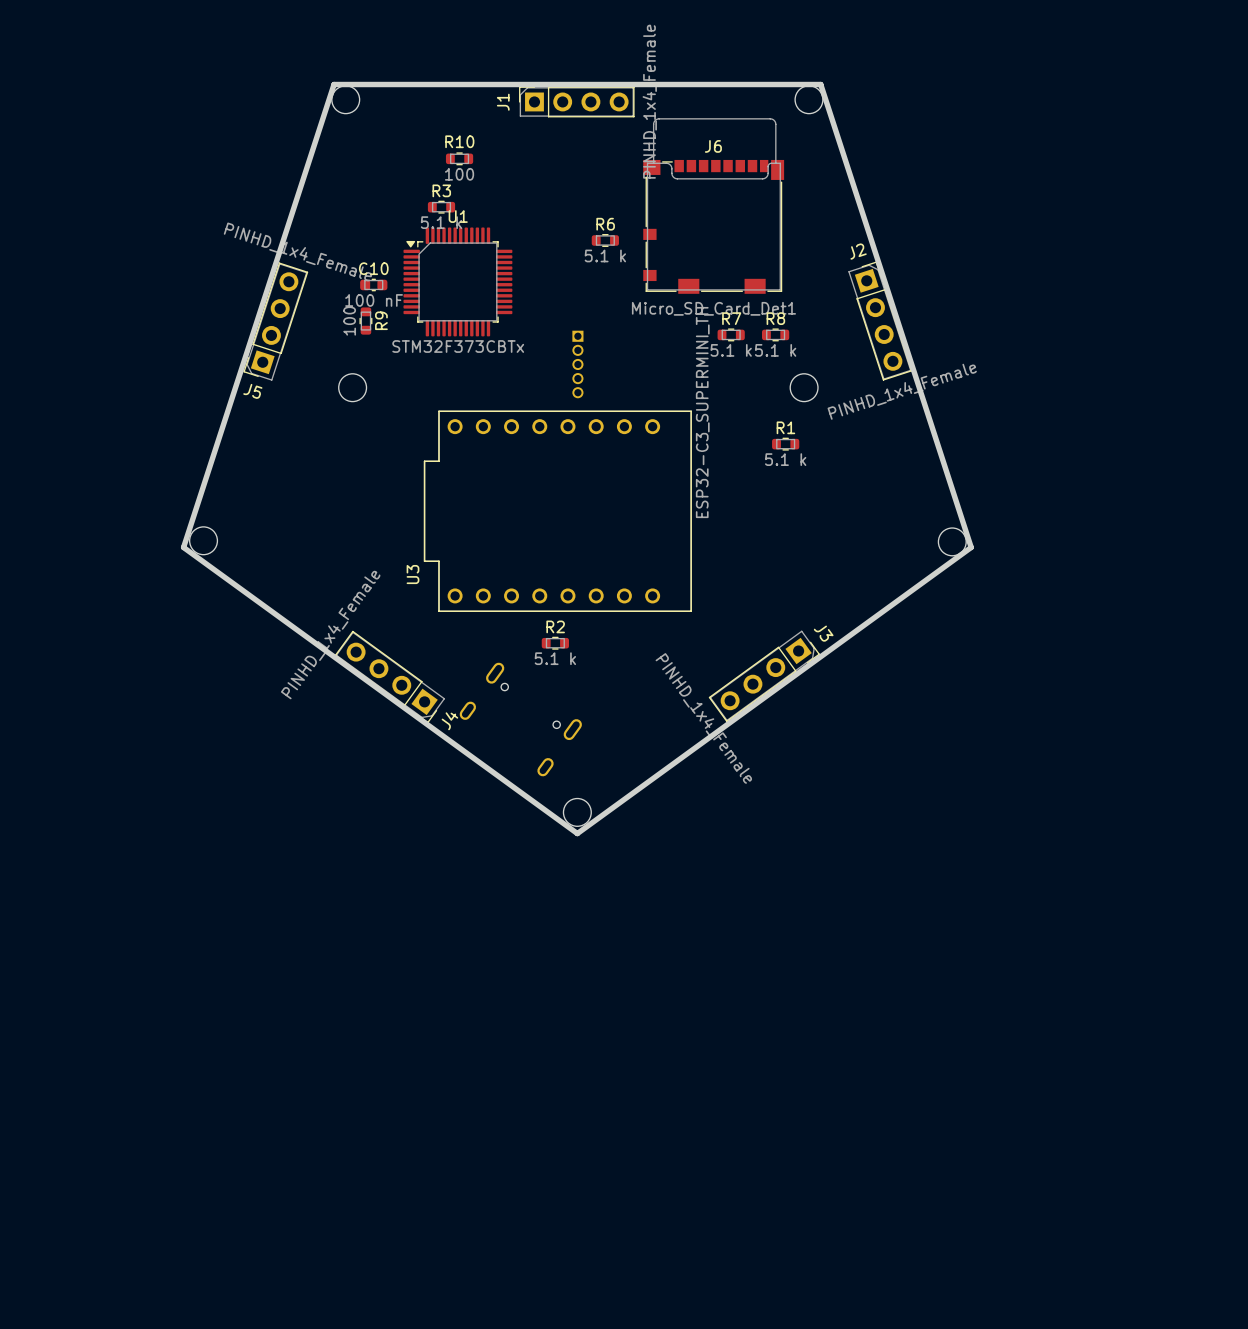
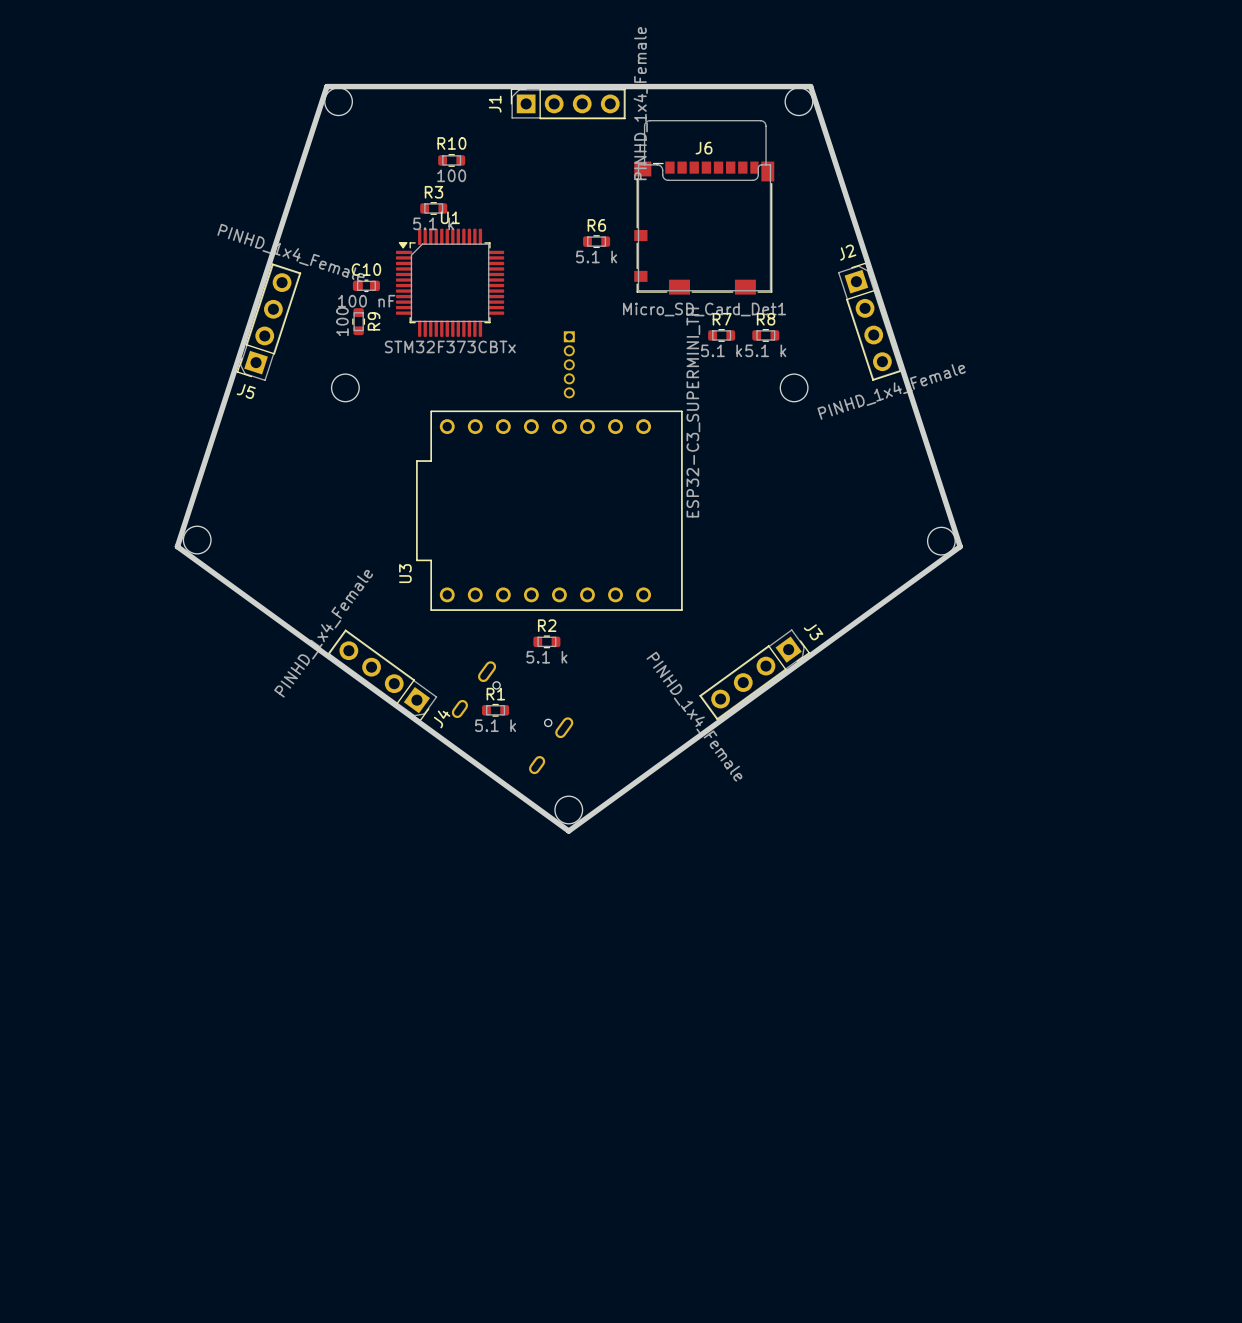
R1 position: (785, 444) -> (495, 710)

